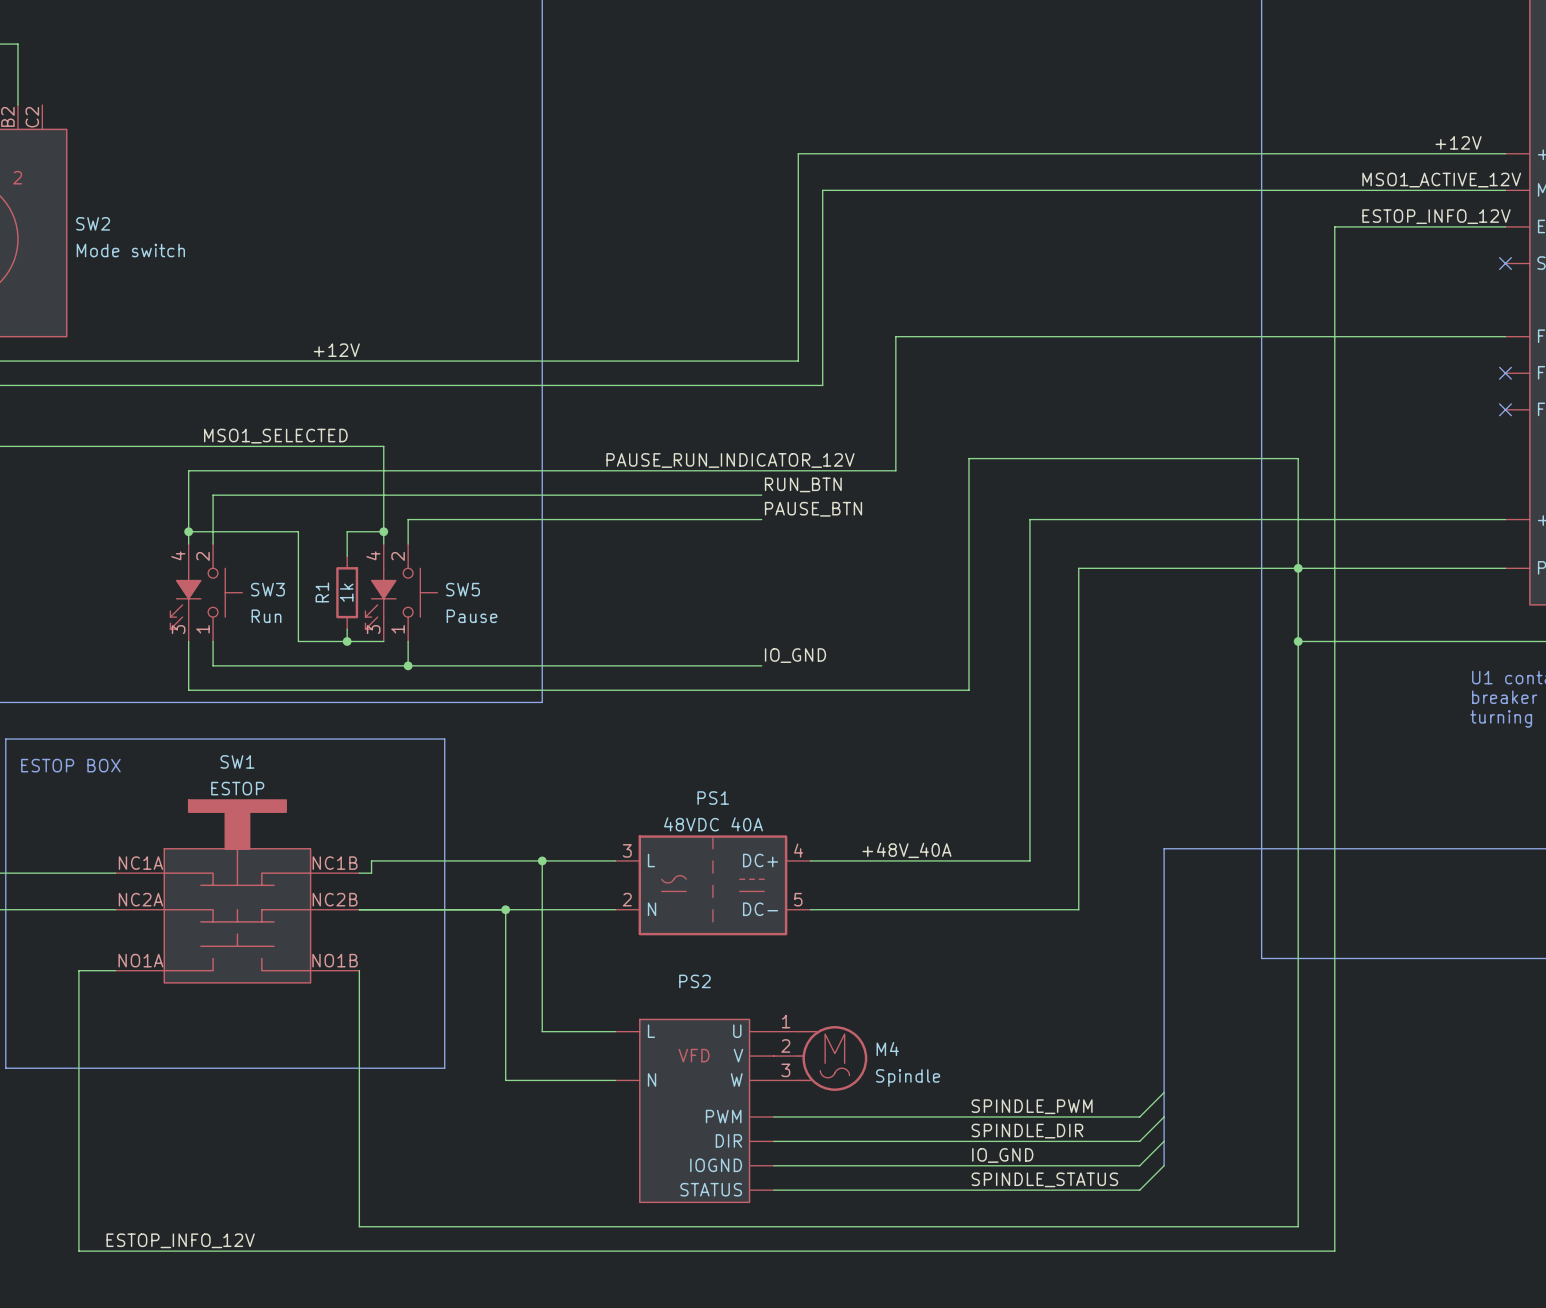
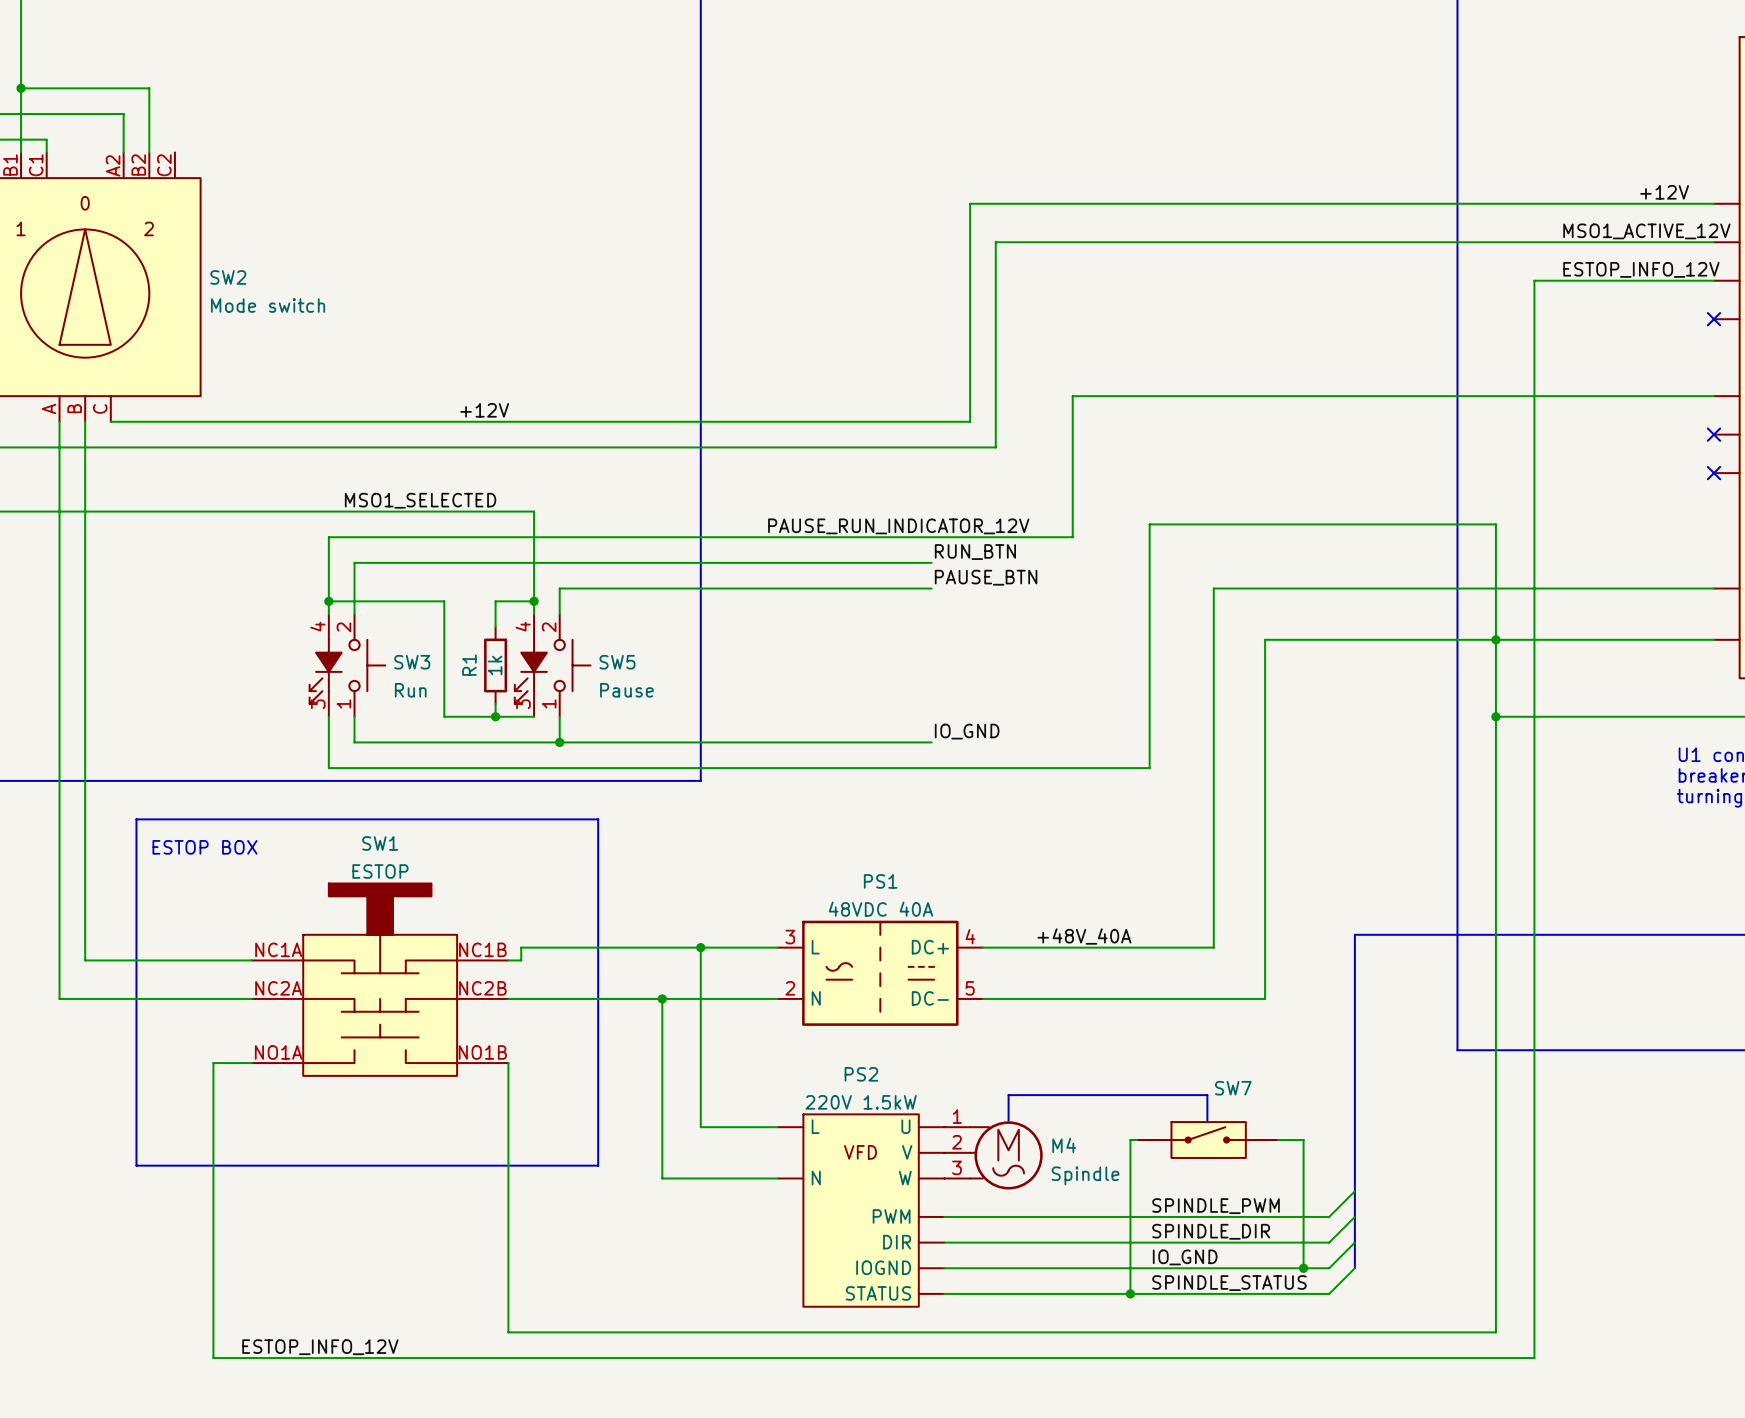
PS2 value: none -> 220V 1.5kW (861, 1102)
line: none -> (1008, 1120) (1008, 1095) (1207, 1095) (1207, 1120)
wire: none -> (1136, 1140) (1130, 1140) (1130, 1293)
SW7: none -> (1207, 1140)
wire: none -> (1277, 1140) (1303, 1140) (1303, 1268)
junction: none -> (1303, 1268)
junction: none -> (1130, 1293)

